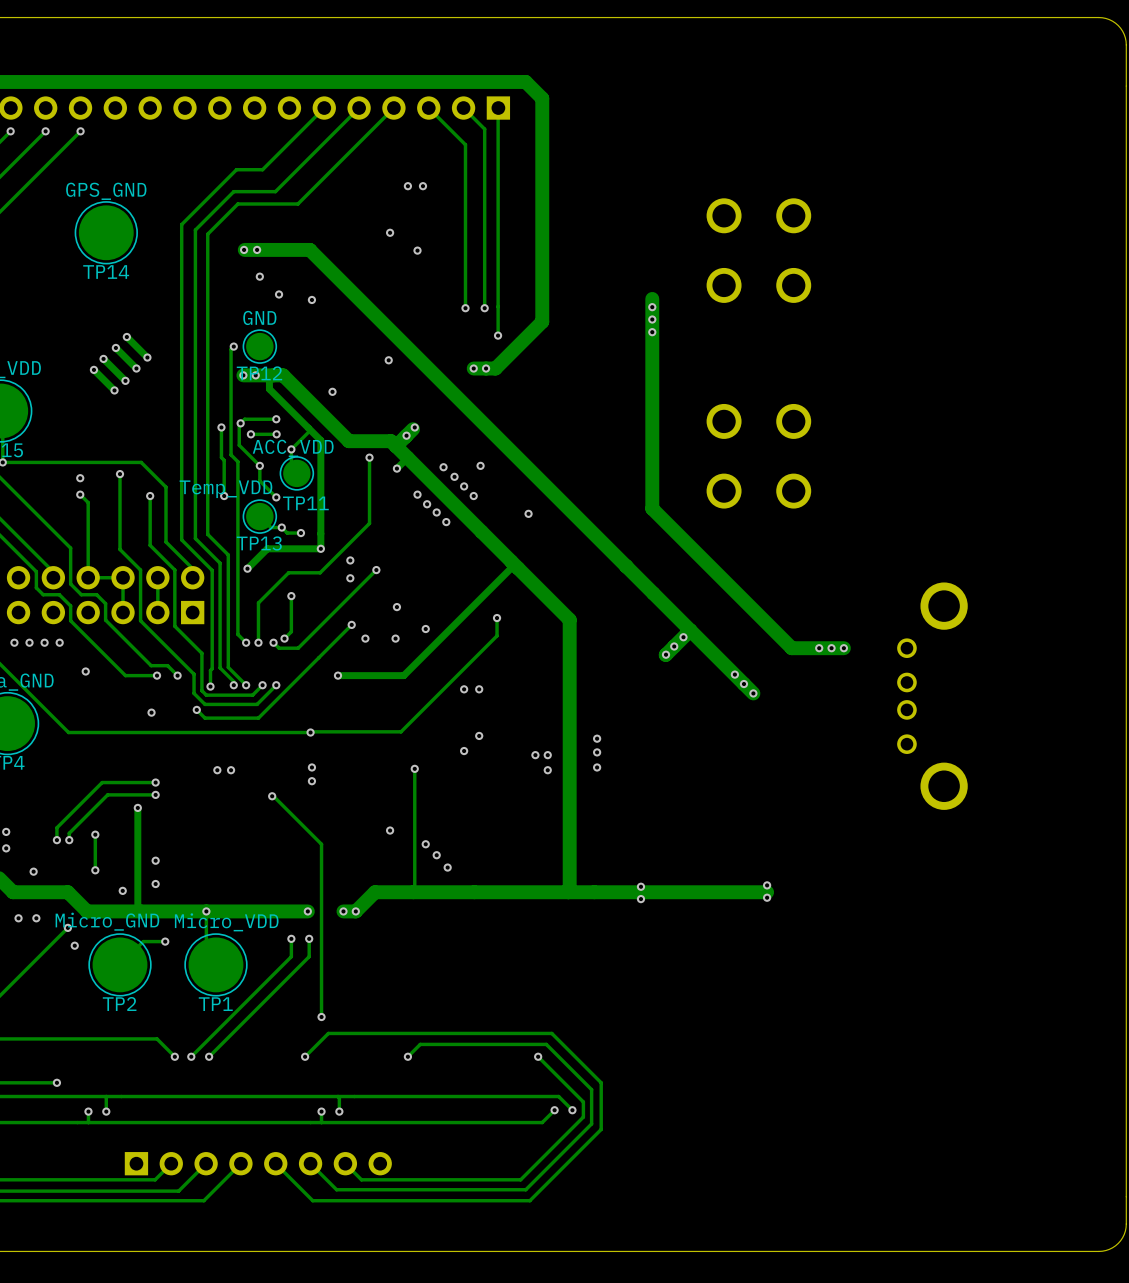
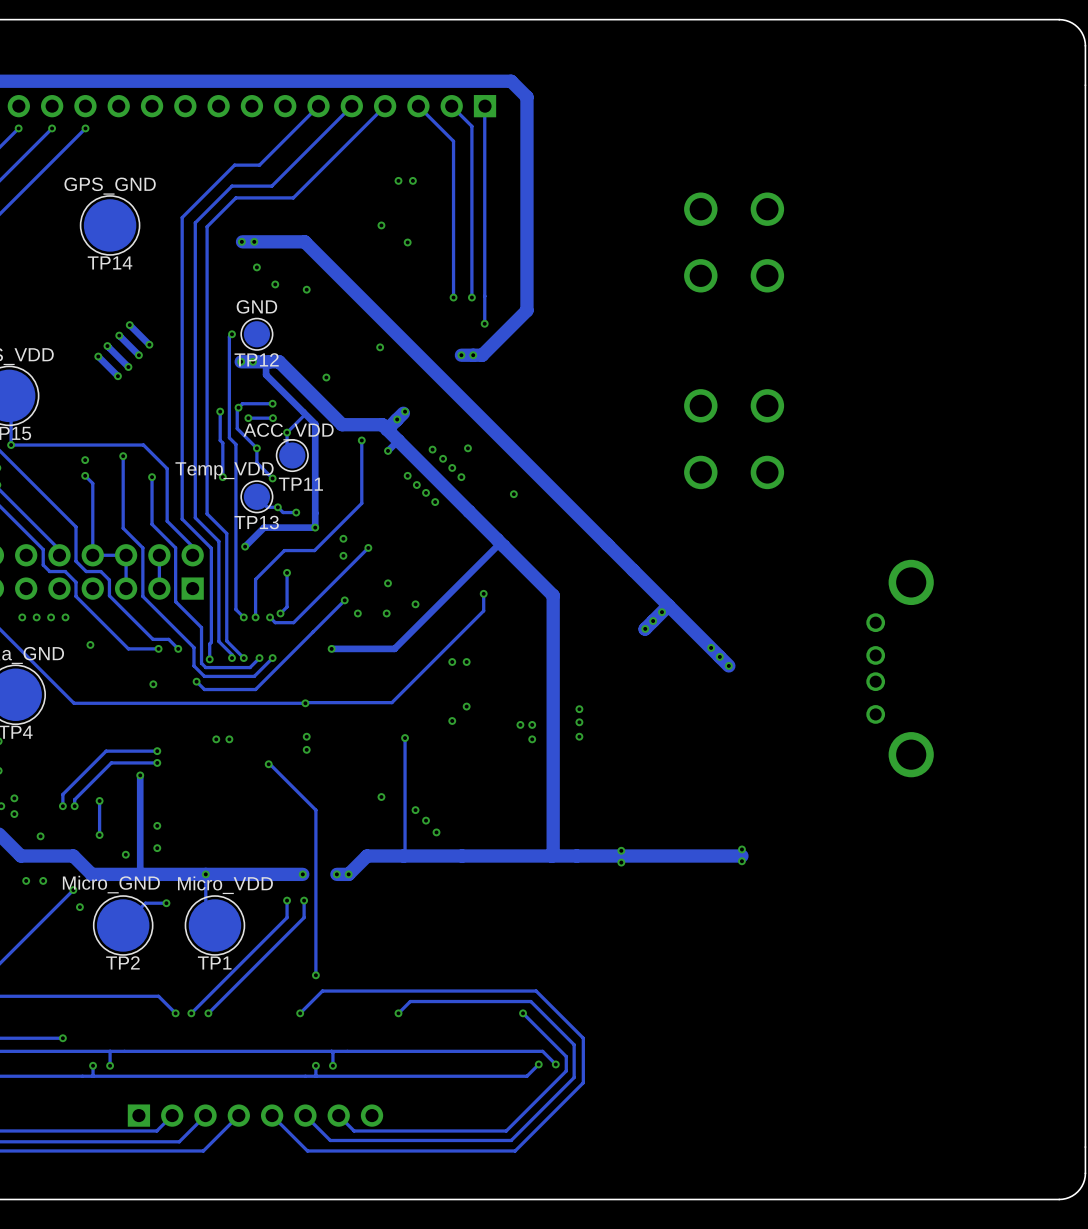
track: (652, 298) (652, 508) (791, 648) (843, 648) -> none
via: (652, 307) -> none
via: (652, 319) -> none
via: (652, 332) -> none
via: (819, 648) -> none
via: (831, 648) -> none
via: (843, 648) -> none

